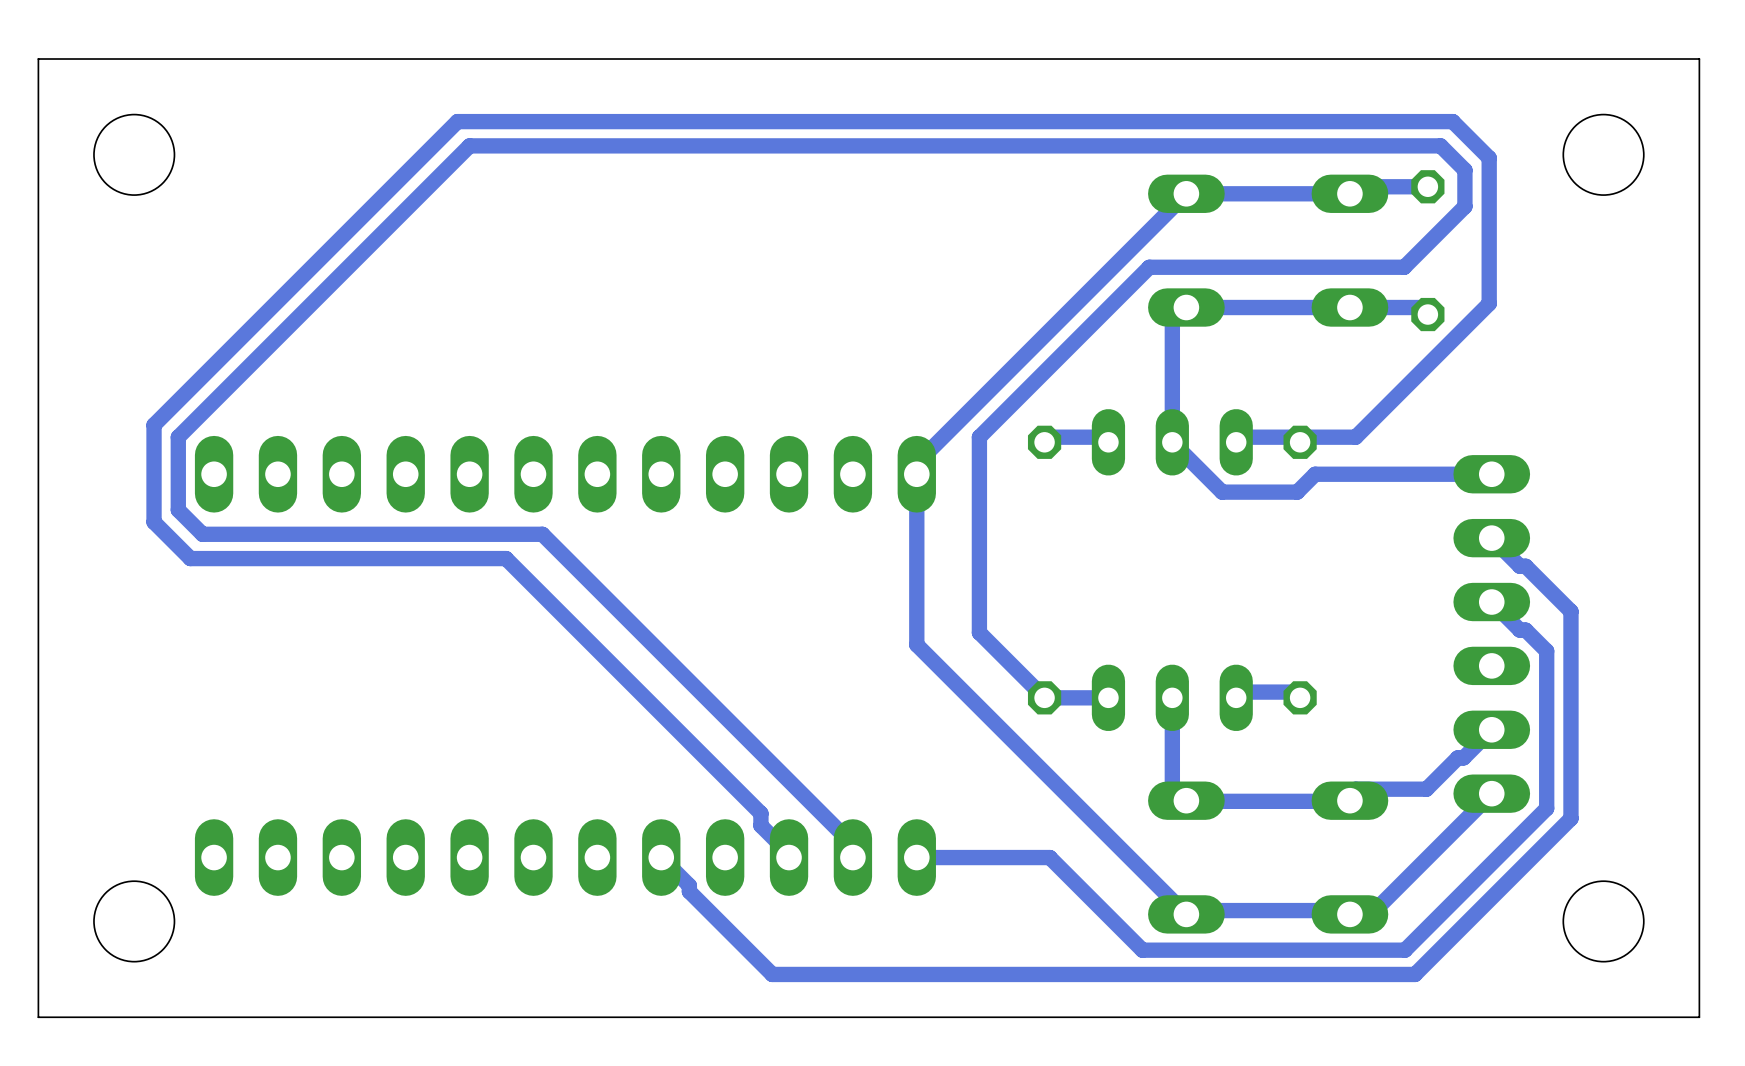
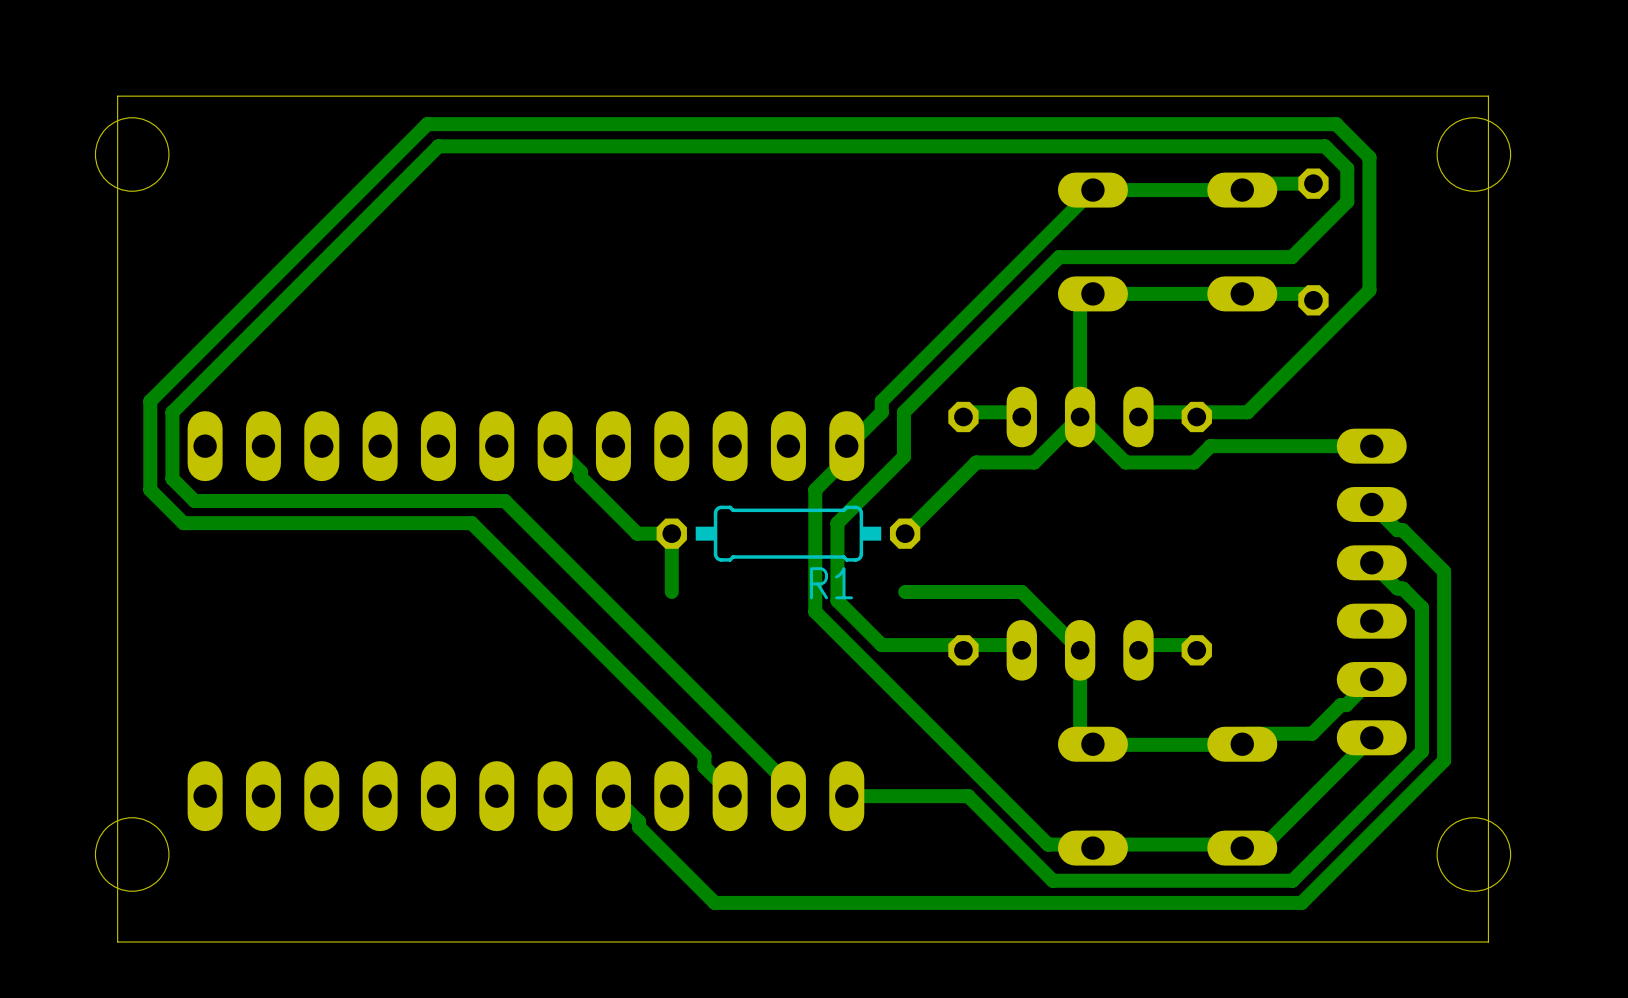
bottom track: (955, 425) (916, 463) (916, 644) (1186, 914) -> (881, 401) (881, 412) (846, 446) (848, 456) (815, 489) (815, 611) (1048, 844) (1092, 844)
bottom track: none -> (1079, 416) (1034, 462) (976, 462) (905, 533)
bottom track: none -> (555, 446) (580, 471) (580, 477) (637, 533) (671, 533) (671, 591)
bottom track: (979, 485) (979, 632) (1044, 697) (1108, 697) -> (903, 456) (837, 523) (837, 600) (881, 645) (959, 645) (963, 650) (970, 645) (1014, 645) (1021, 650)
R1: none -> (788, 533)
bottom track: none -> (905, 591) (1021, 591) (1080, 650)
board edge: (1619, 1017) (1699, 1017) (1699, 59) (38, 59) (38, 1017) (118, 1017) -> (1488, 941) (1488, 96) (117, 96) (117, 941)

